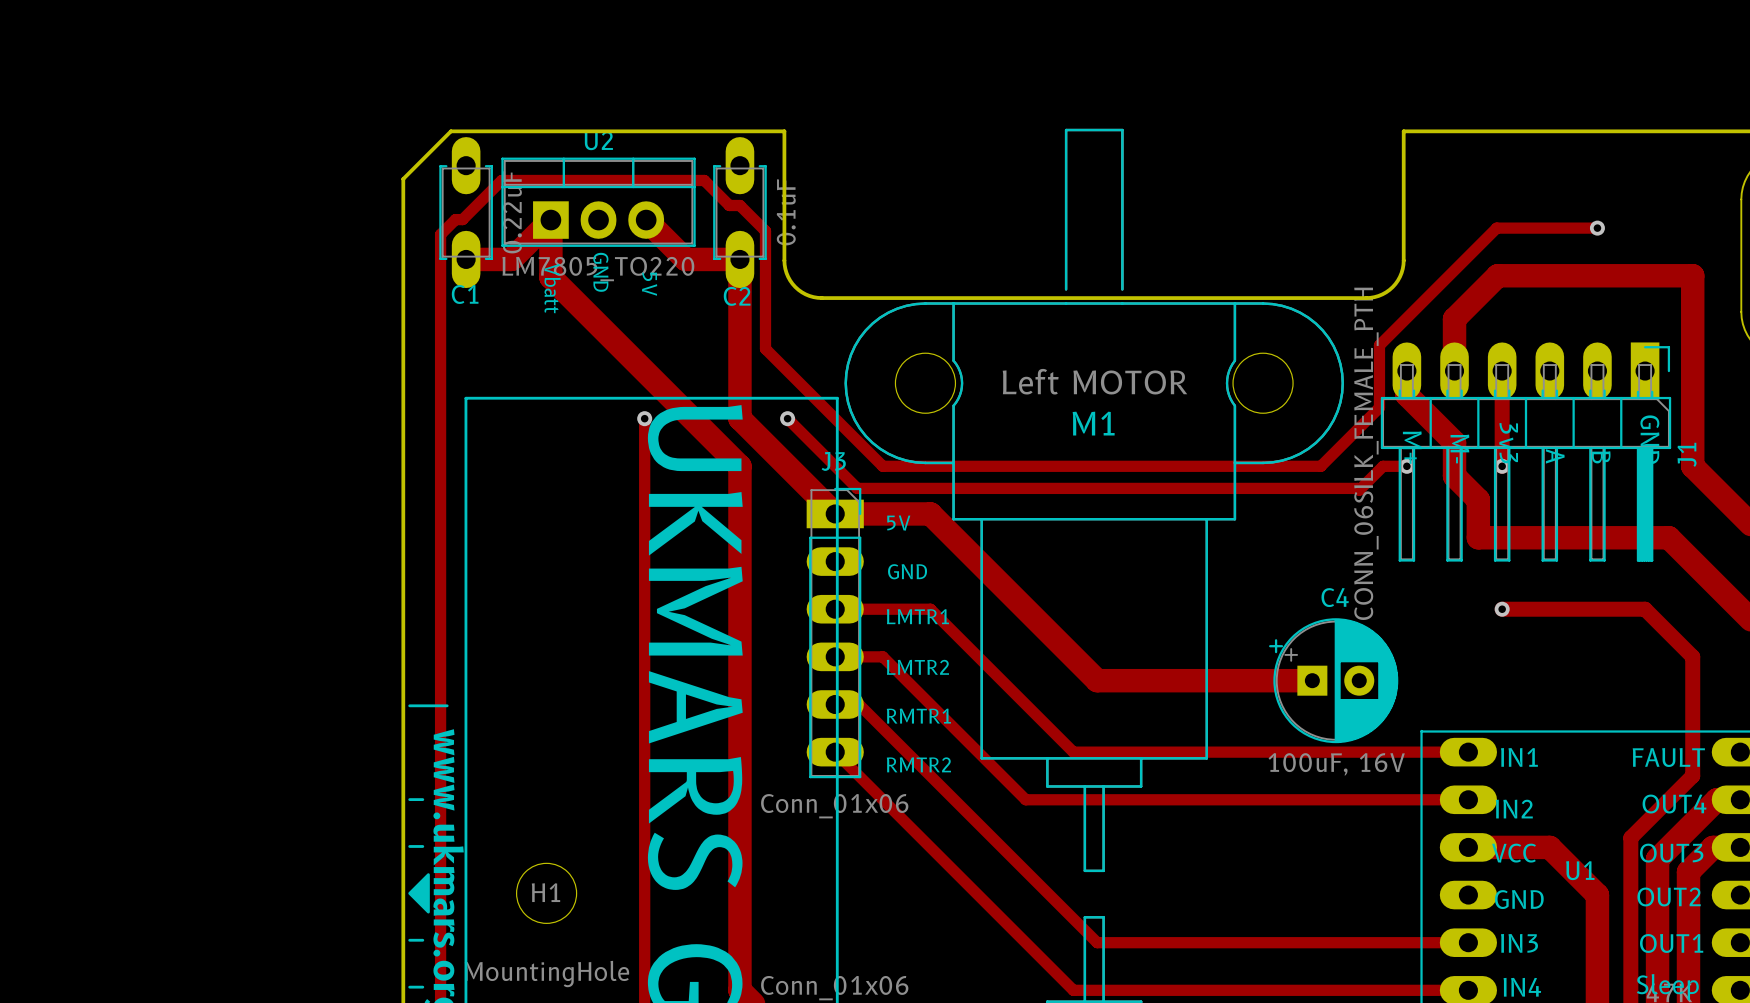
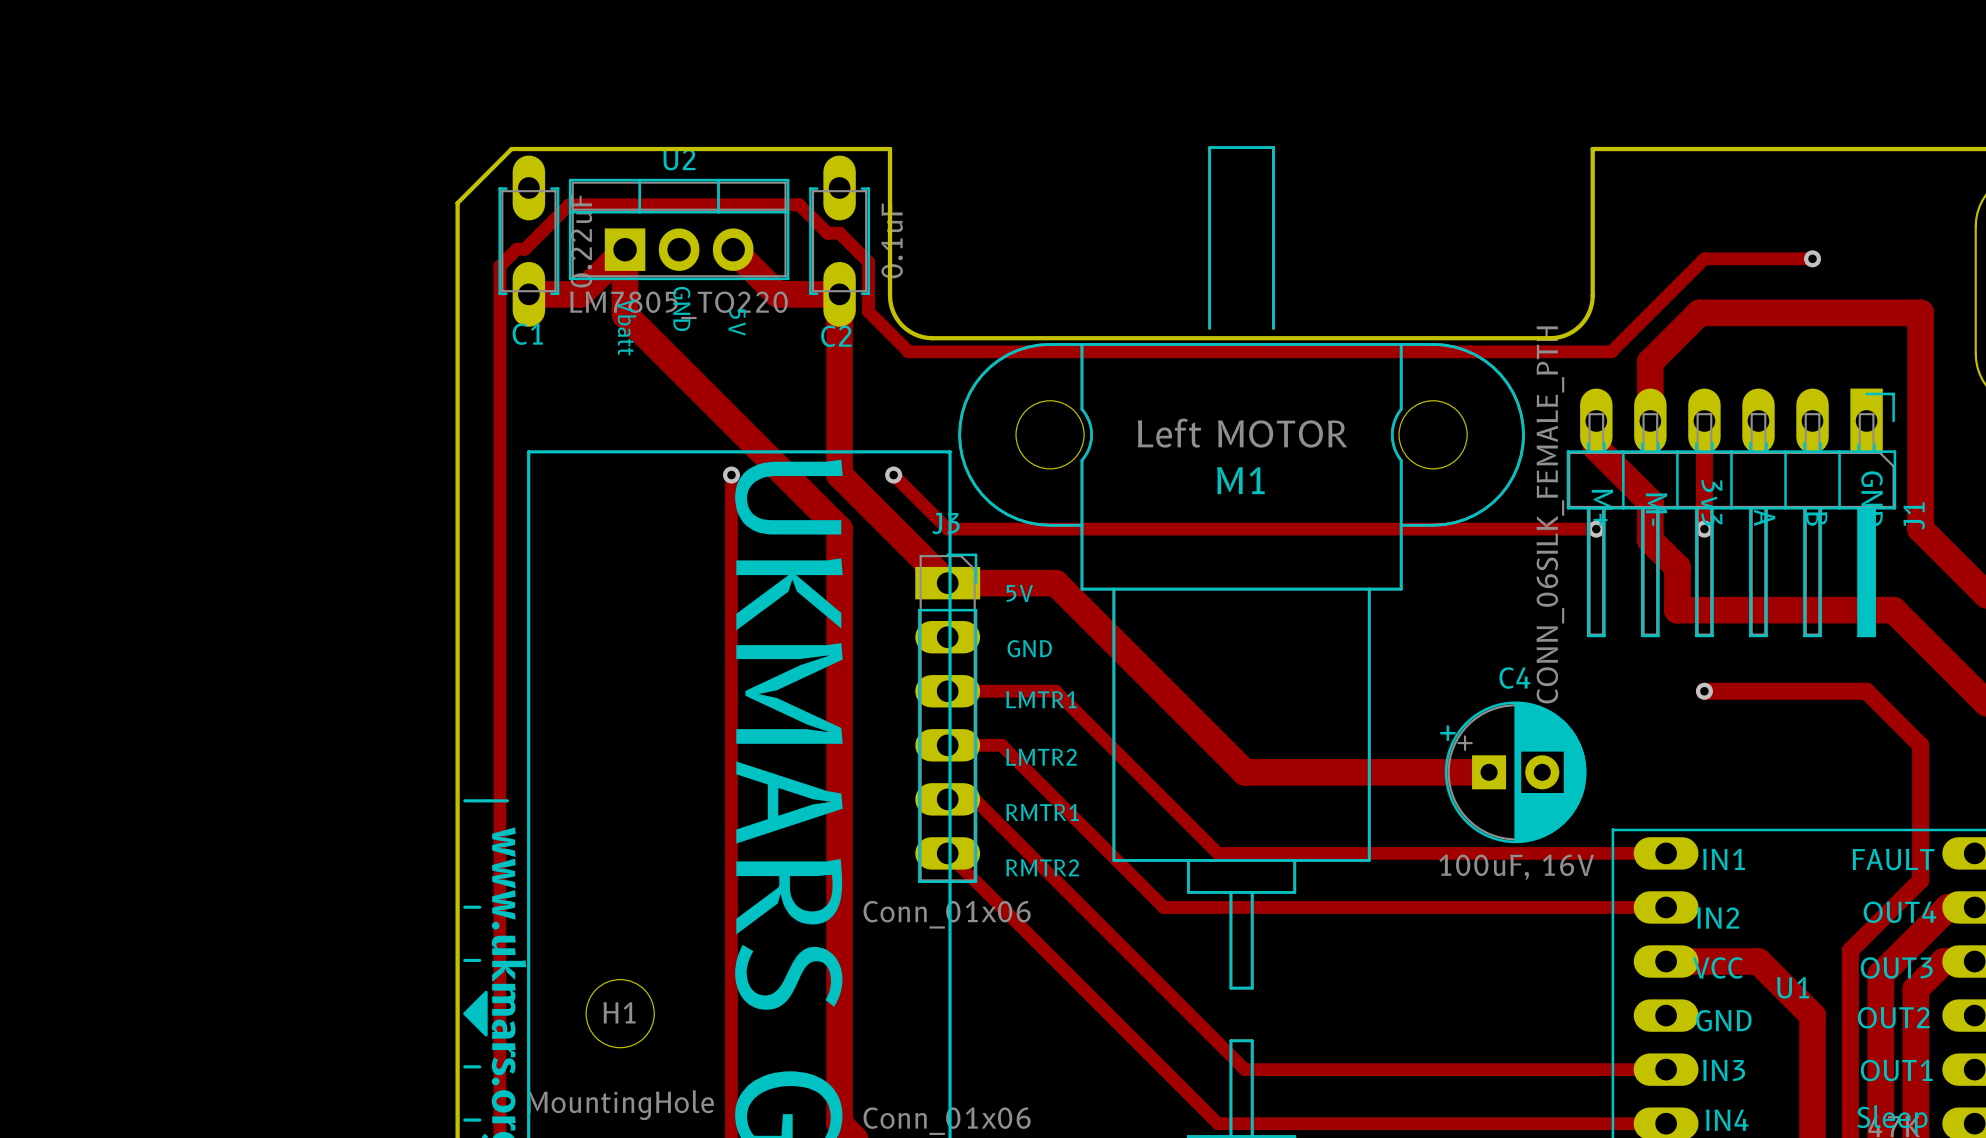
track: (1502, 228) (1496, 228) (1379, 345) (1379, 407) (1320, 466) -> (1569, 529) (1498, 529)
track: none -> (1704, 258) (1611, 351) (908, 351) (868, 311)
track: (765, 274) (765, 348) (882, 466) -> (947, 529) (1001, 529)
track: (835, 466) (857, 488) (1357, 488) (1359, 490) (1383, 466) -> none

